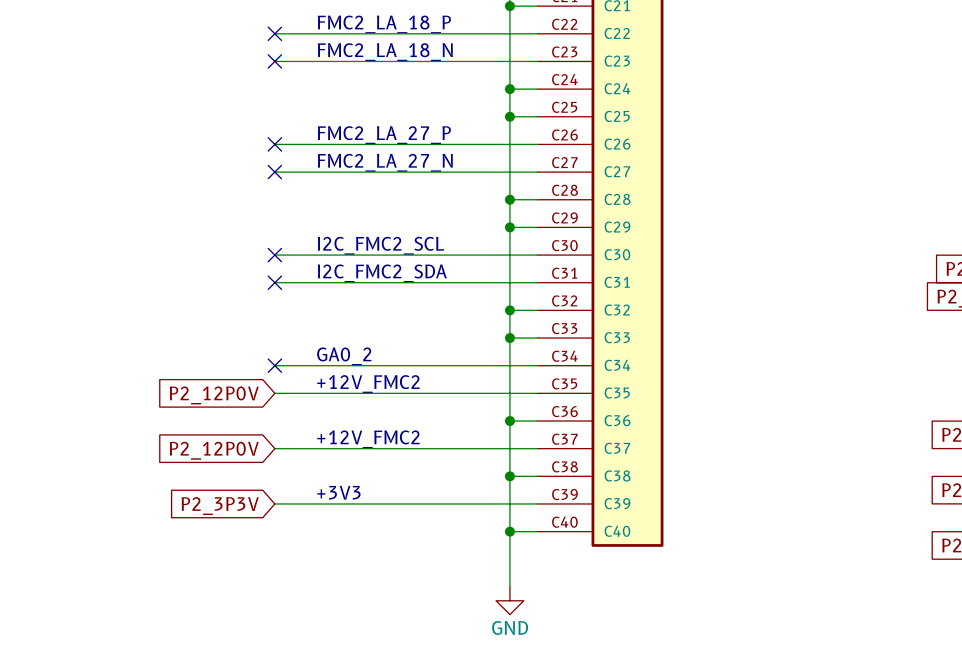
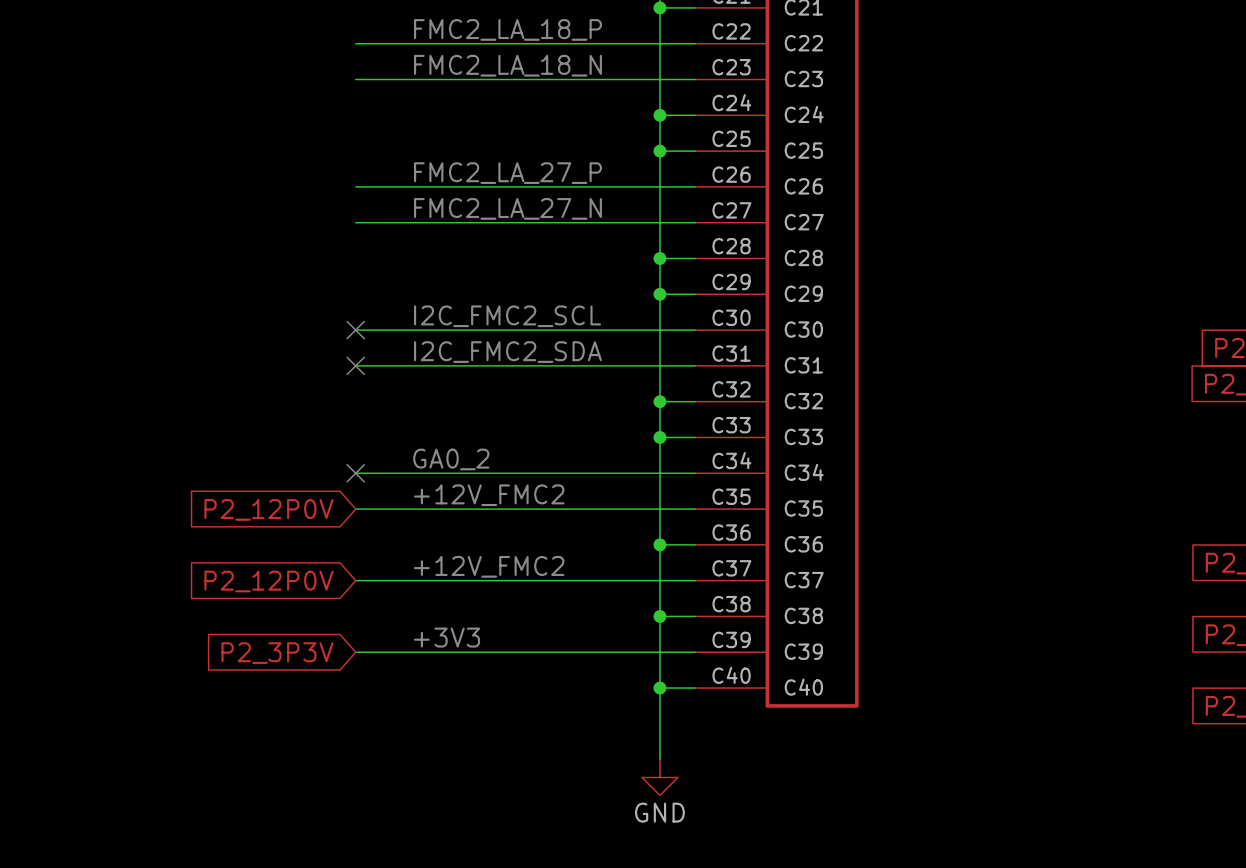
no-connect mark: (274, 33) -> none
no-connect mark: (274, 61) -> none
no-connect mark: (274, 144) -> none
no-connect mark: (274, 172) -> none

